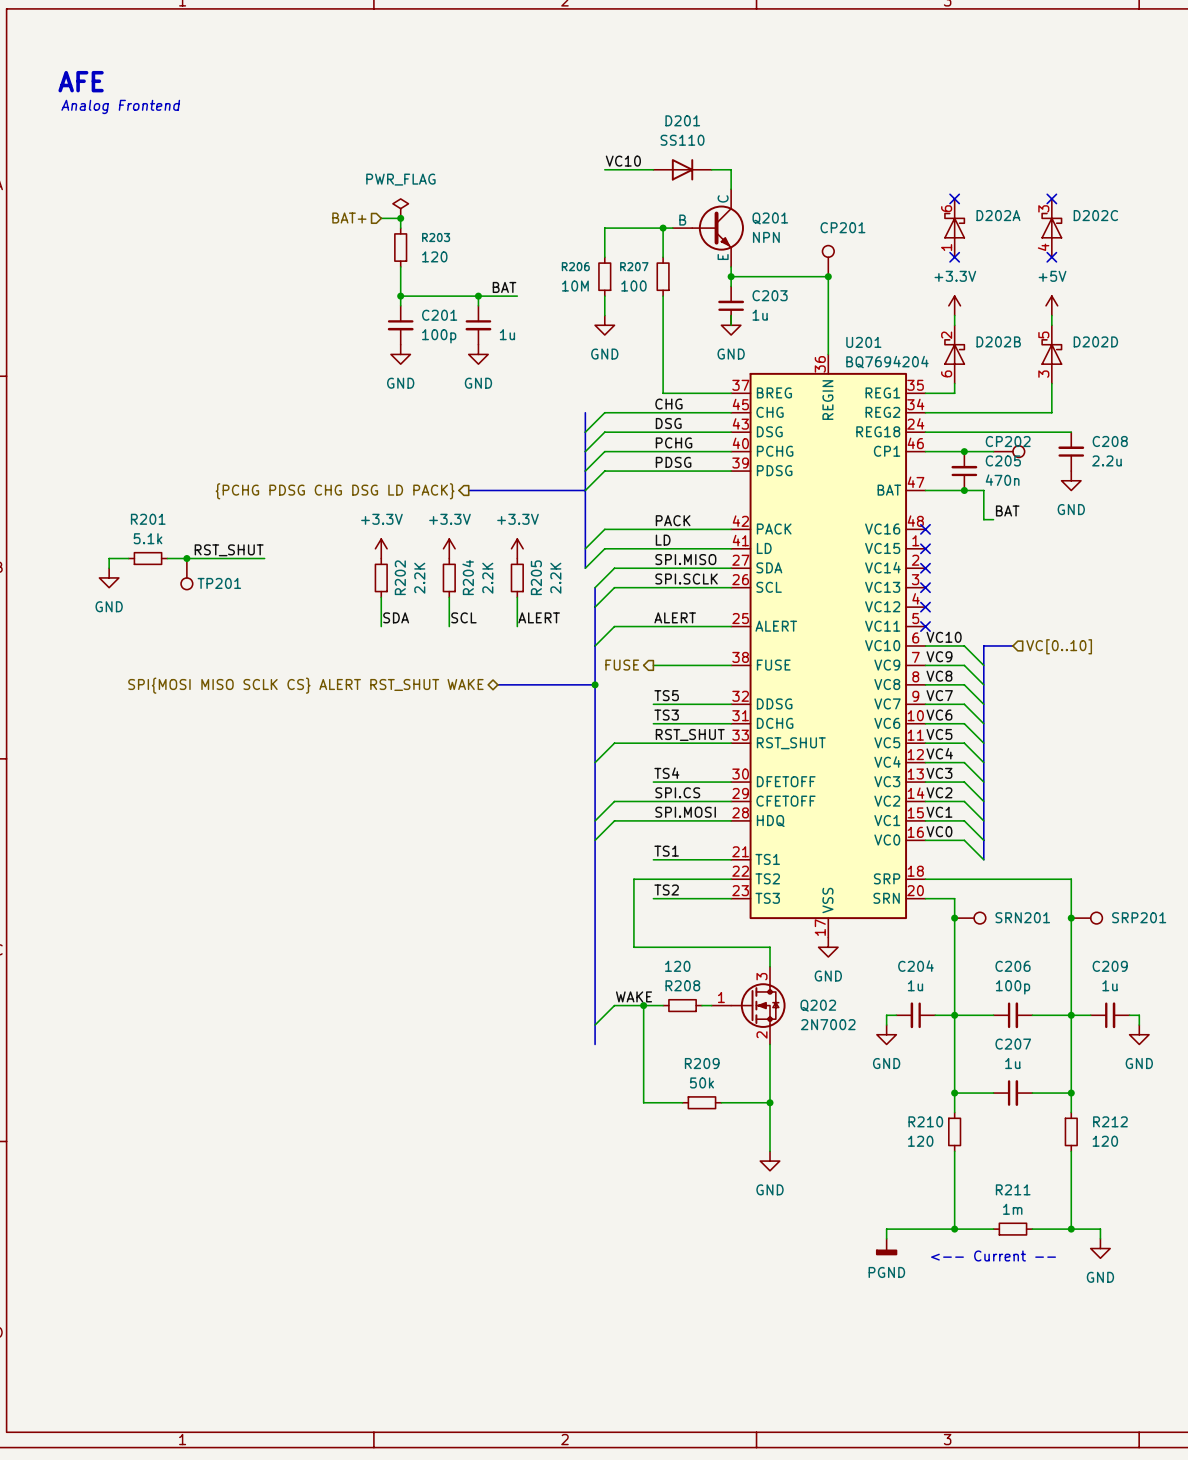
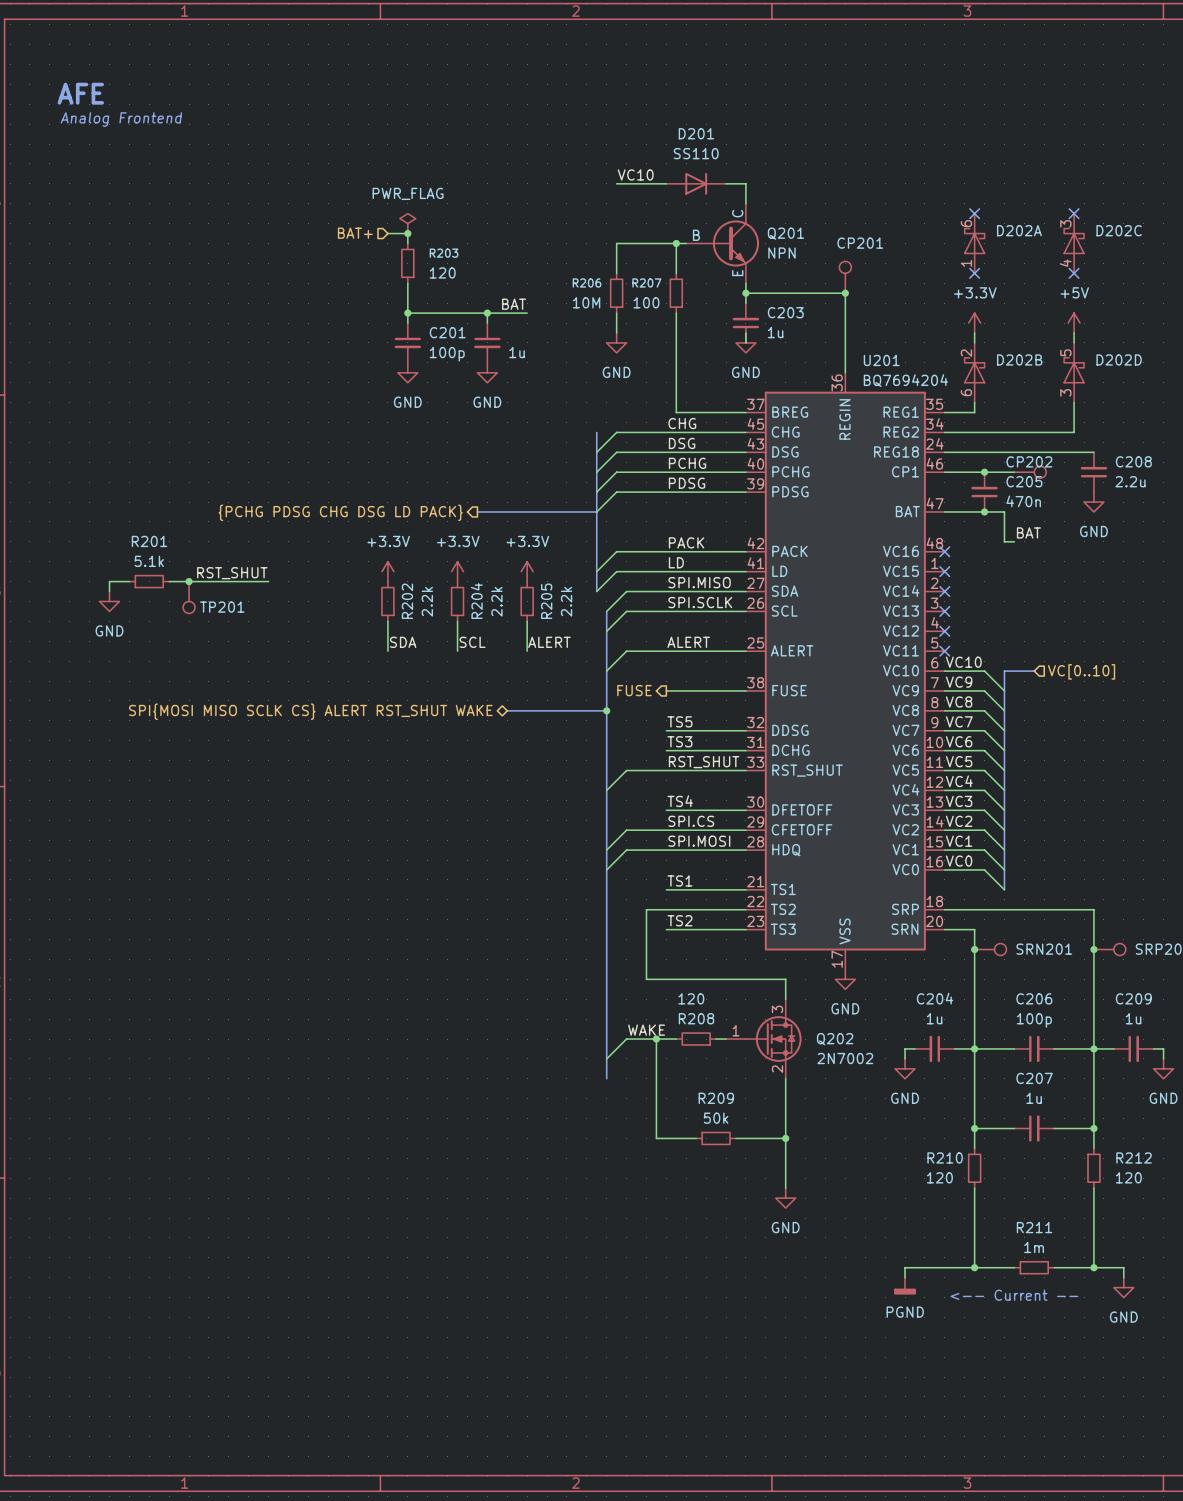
R202 value: 2.2K (419, 578) -> 2.2k (427, 601)
R204 value: 2.2K (487, 578) -> 2.2k (496, 601)
R205 value: 2.2K (555, 578) -> 2.2k (566, 601)

